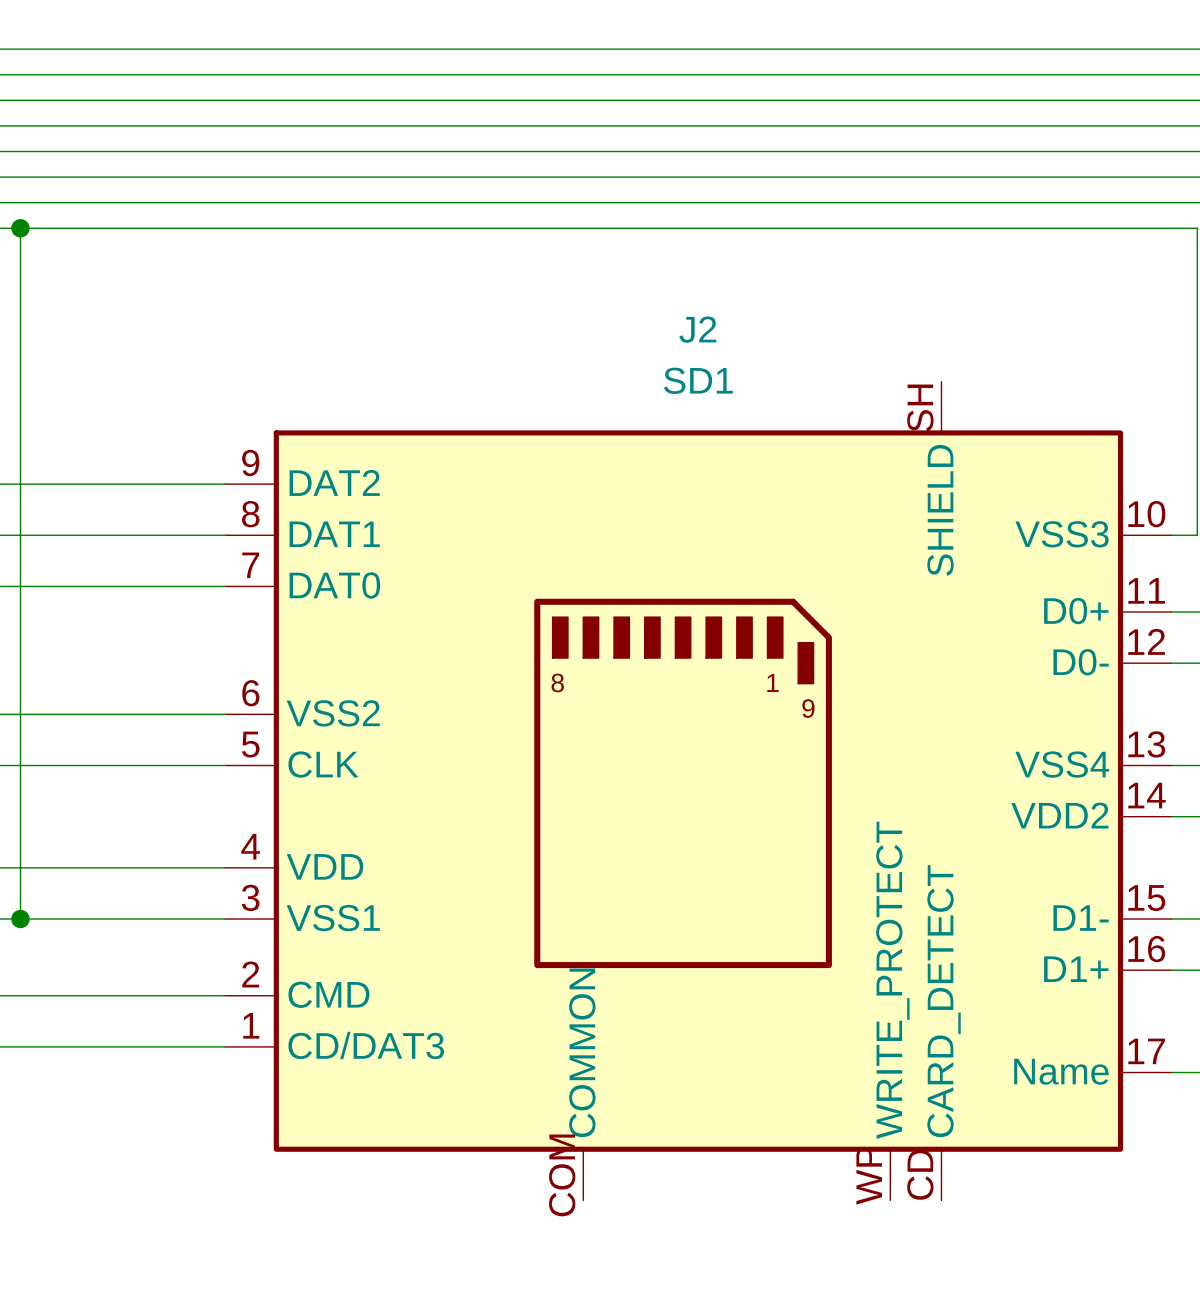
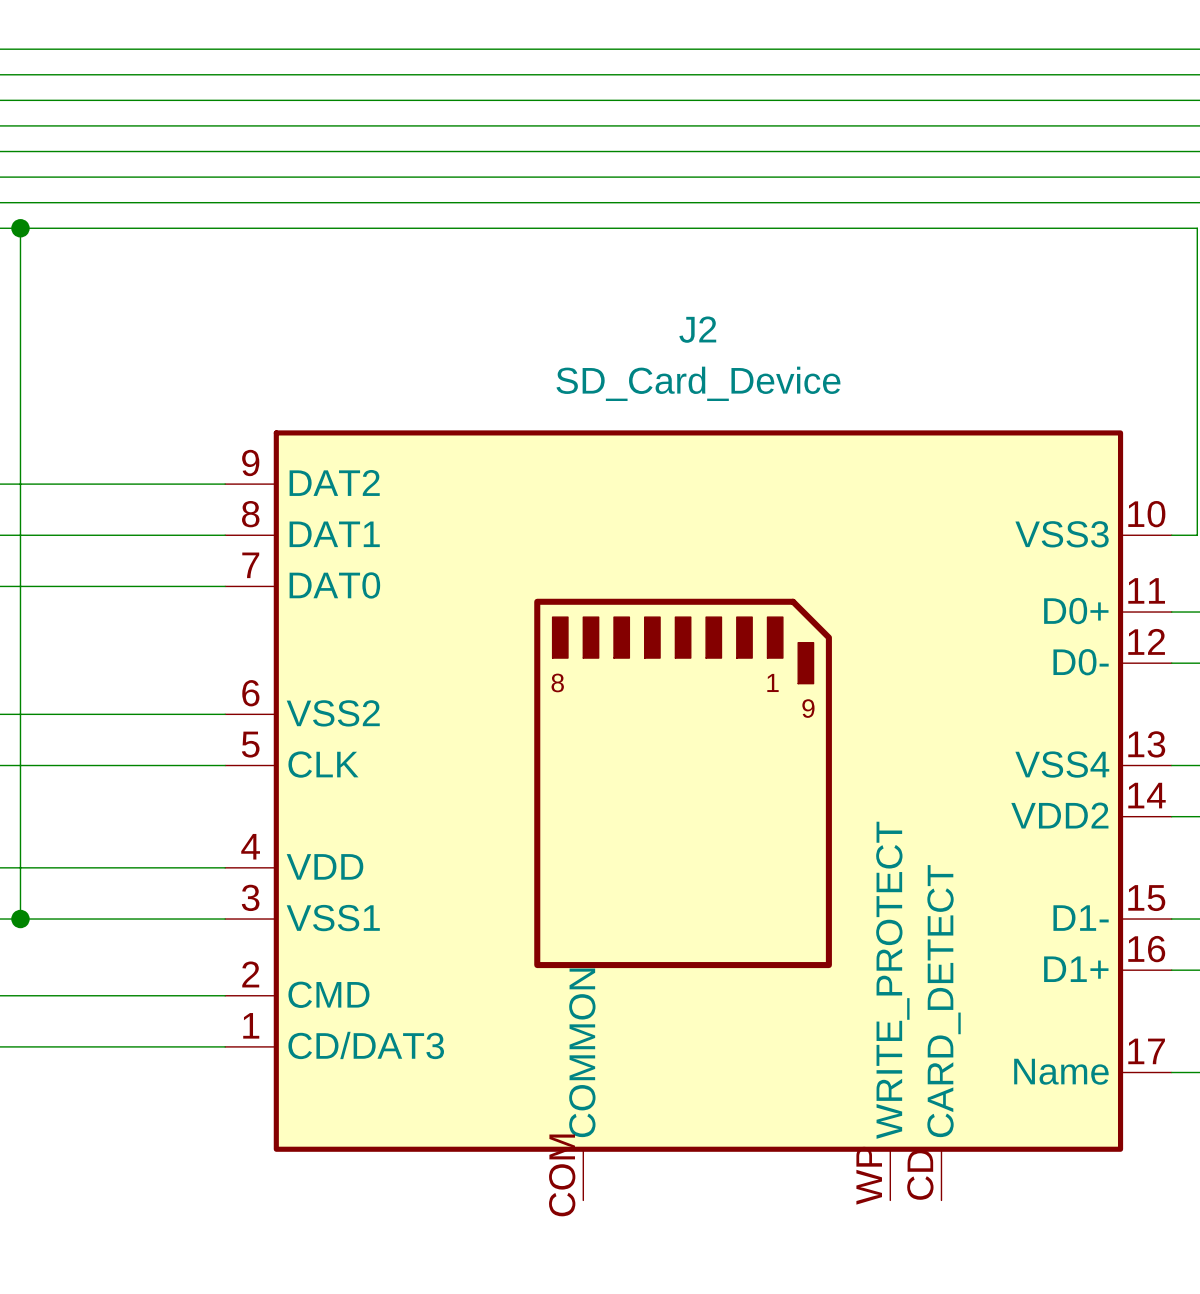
J2 value: SD1 (698, 380) -> SD_Card_Device (698, 383)
J2 symbol: [225, 381, 1172, 1201] -> [225, 430, 1172, 1201]

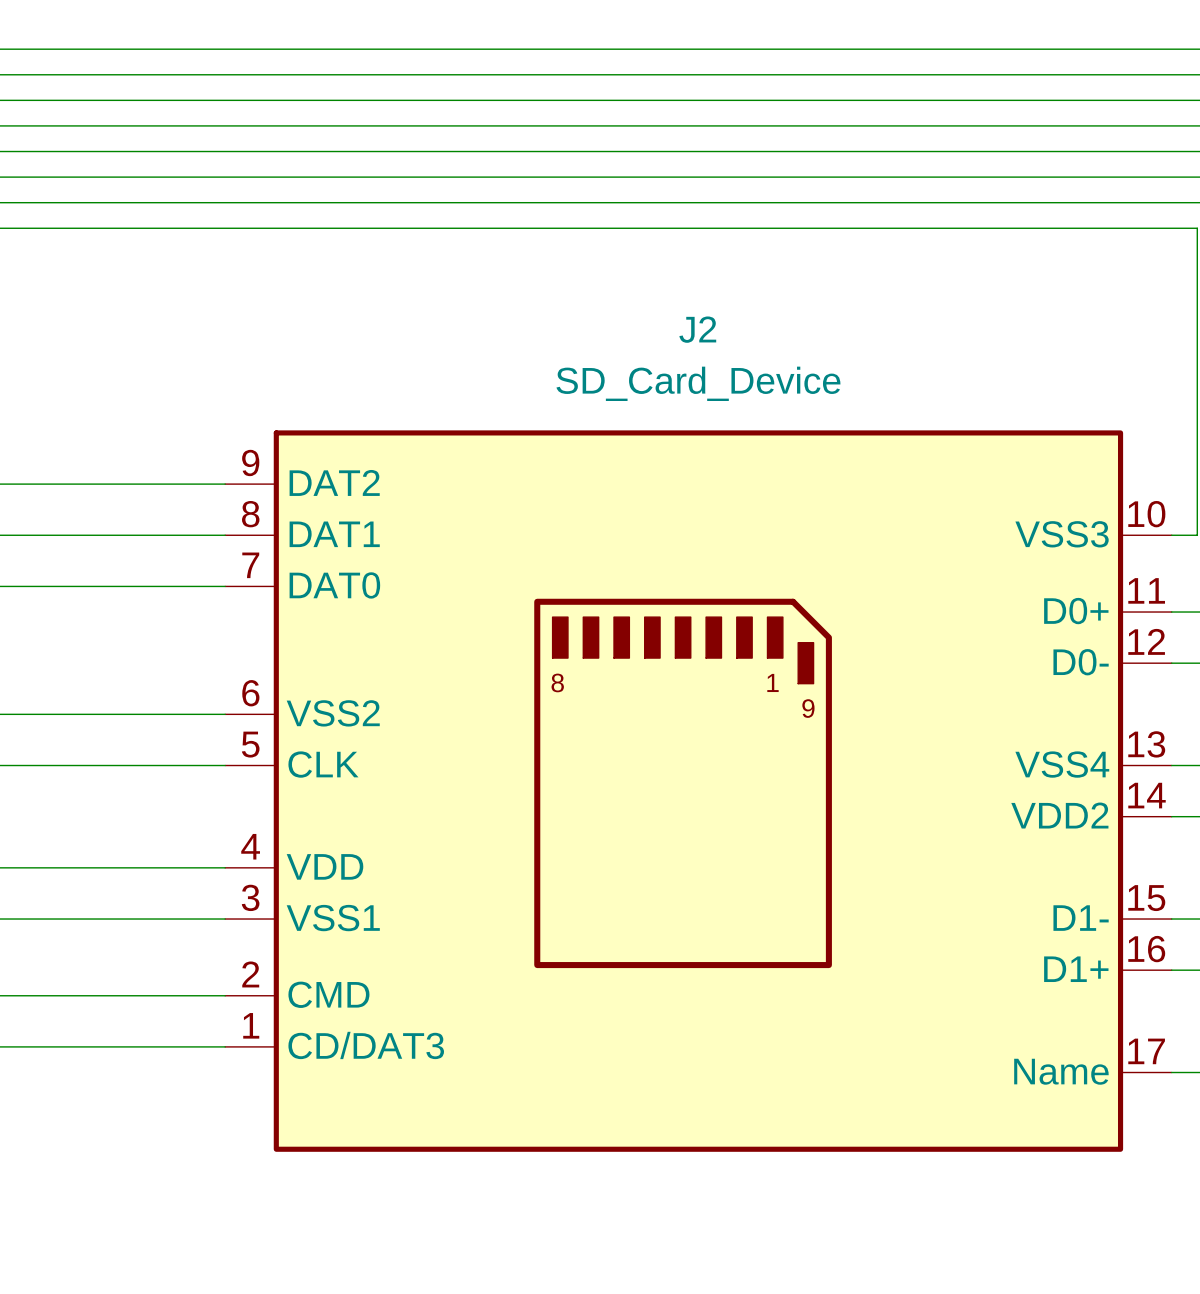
wire: (20, 228) (20, 919) -> none
junction: (20, 228) -> none
J2 symbol: [225, 430, 1172, 1201] -> [225, 430, 1172, 1152]
junction: (20, 919) -> none

